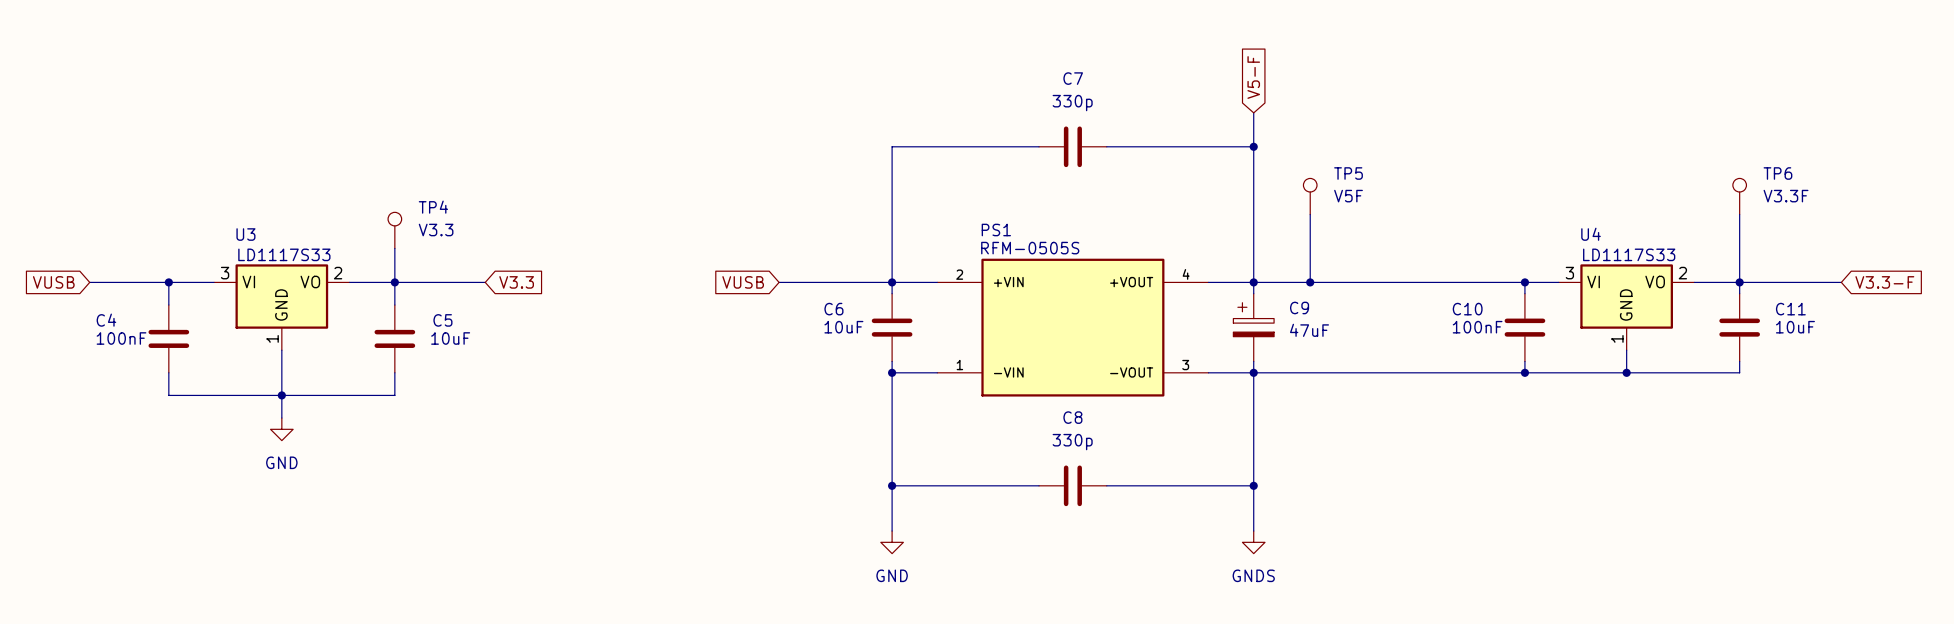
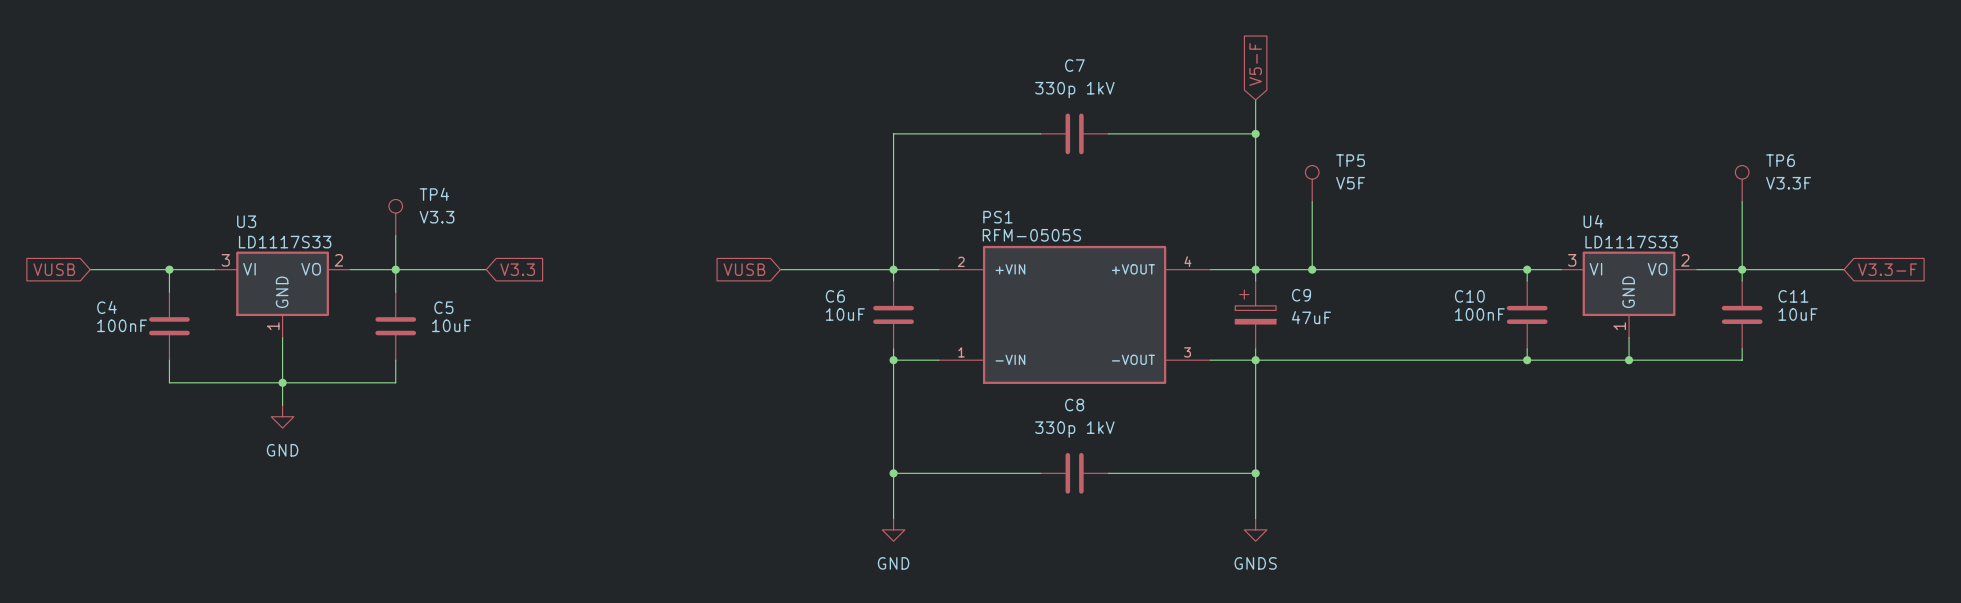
C7 value: 330p (1072, 103) -> 330p 1kV (1074, 90)
C8 value: 330p (1072, 442) -> 330p 1kV (1074, 429)

